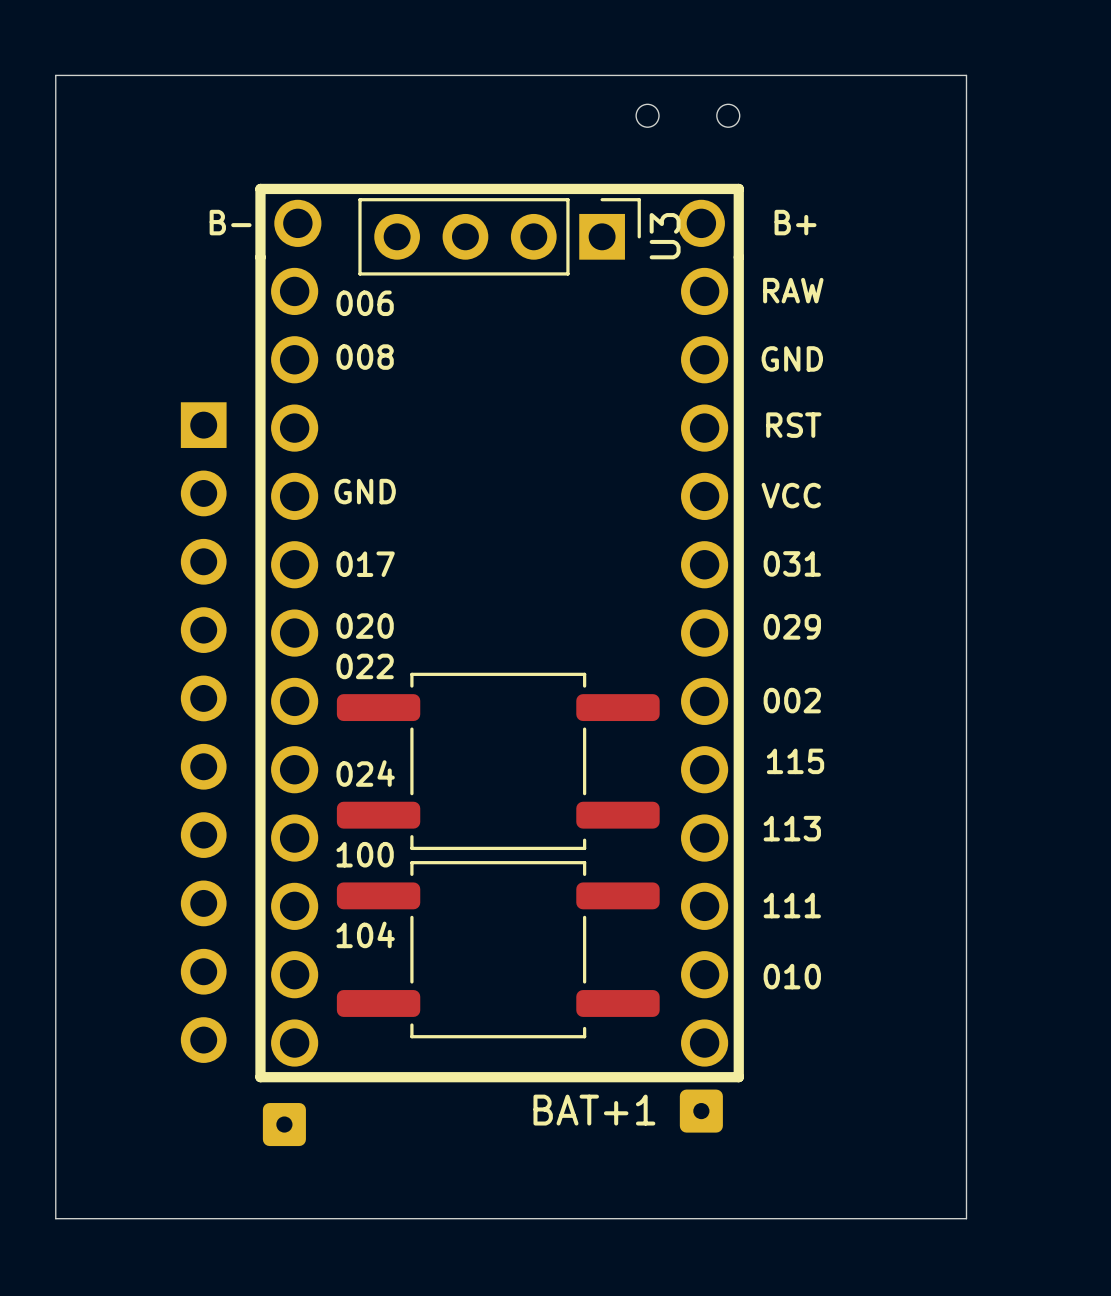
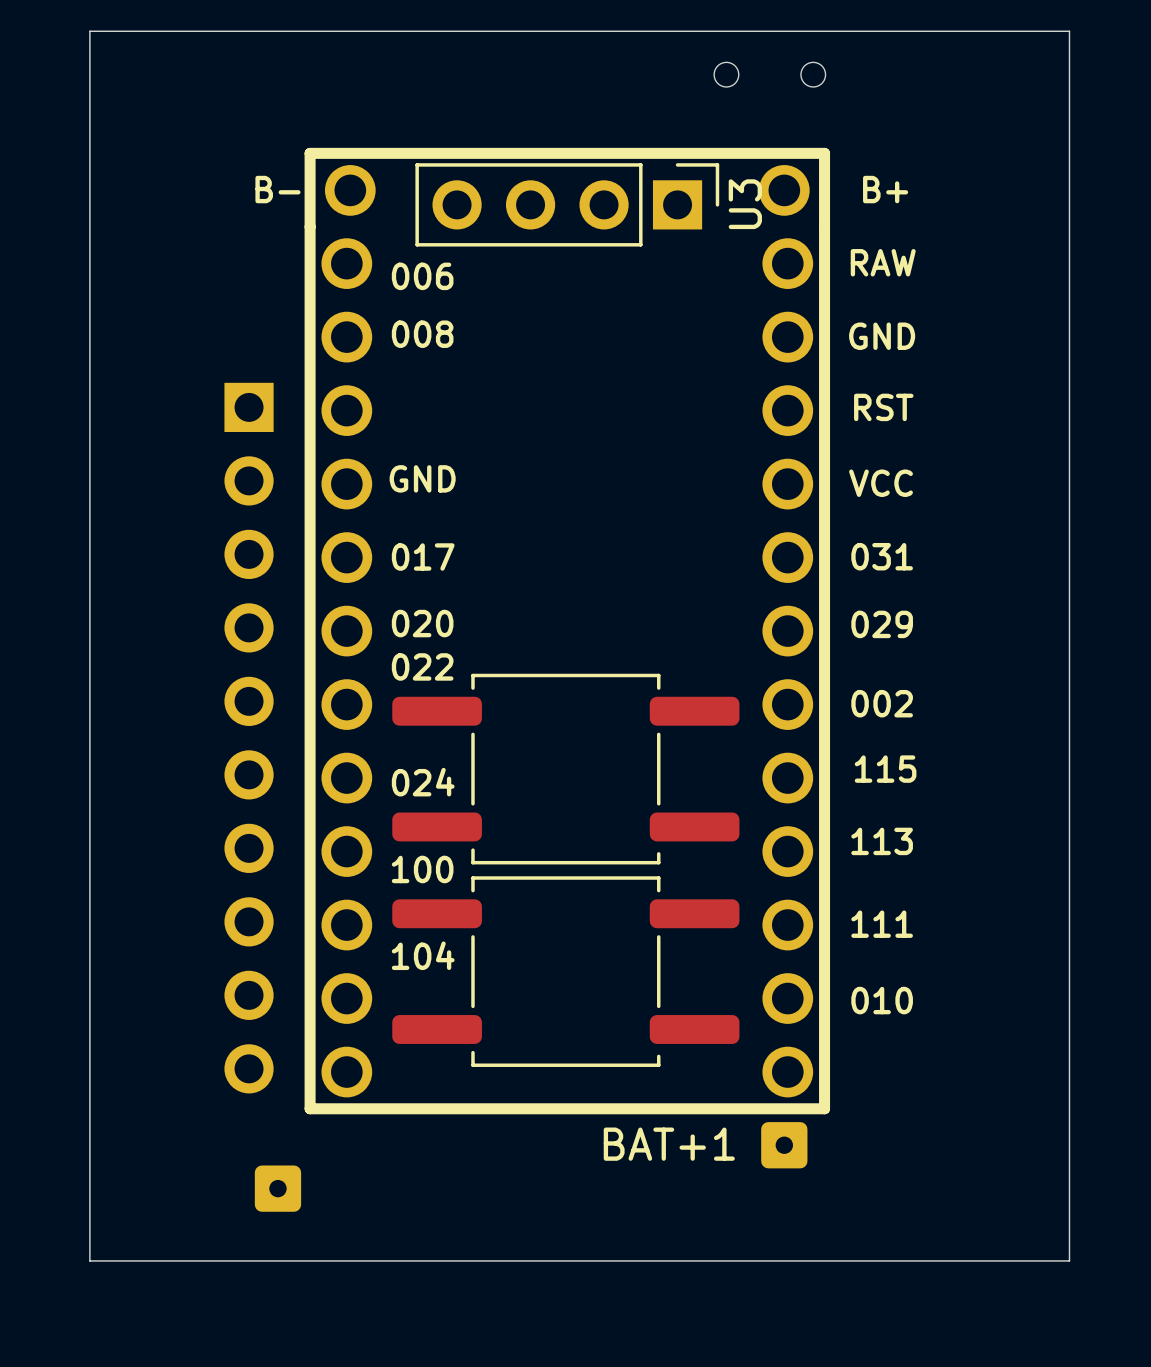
part position: (284, 1124) -> (277, 1188)

